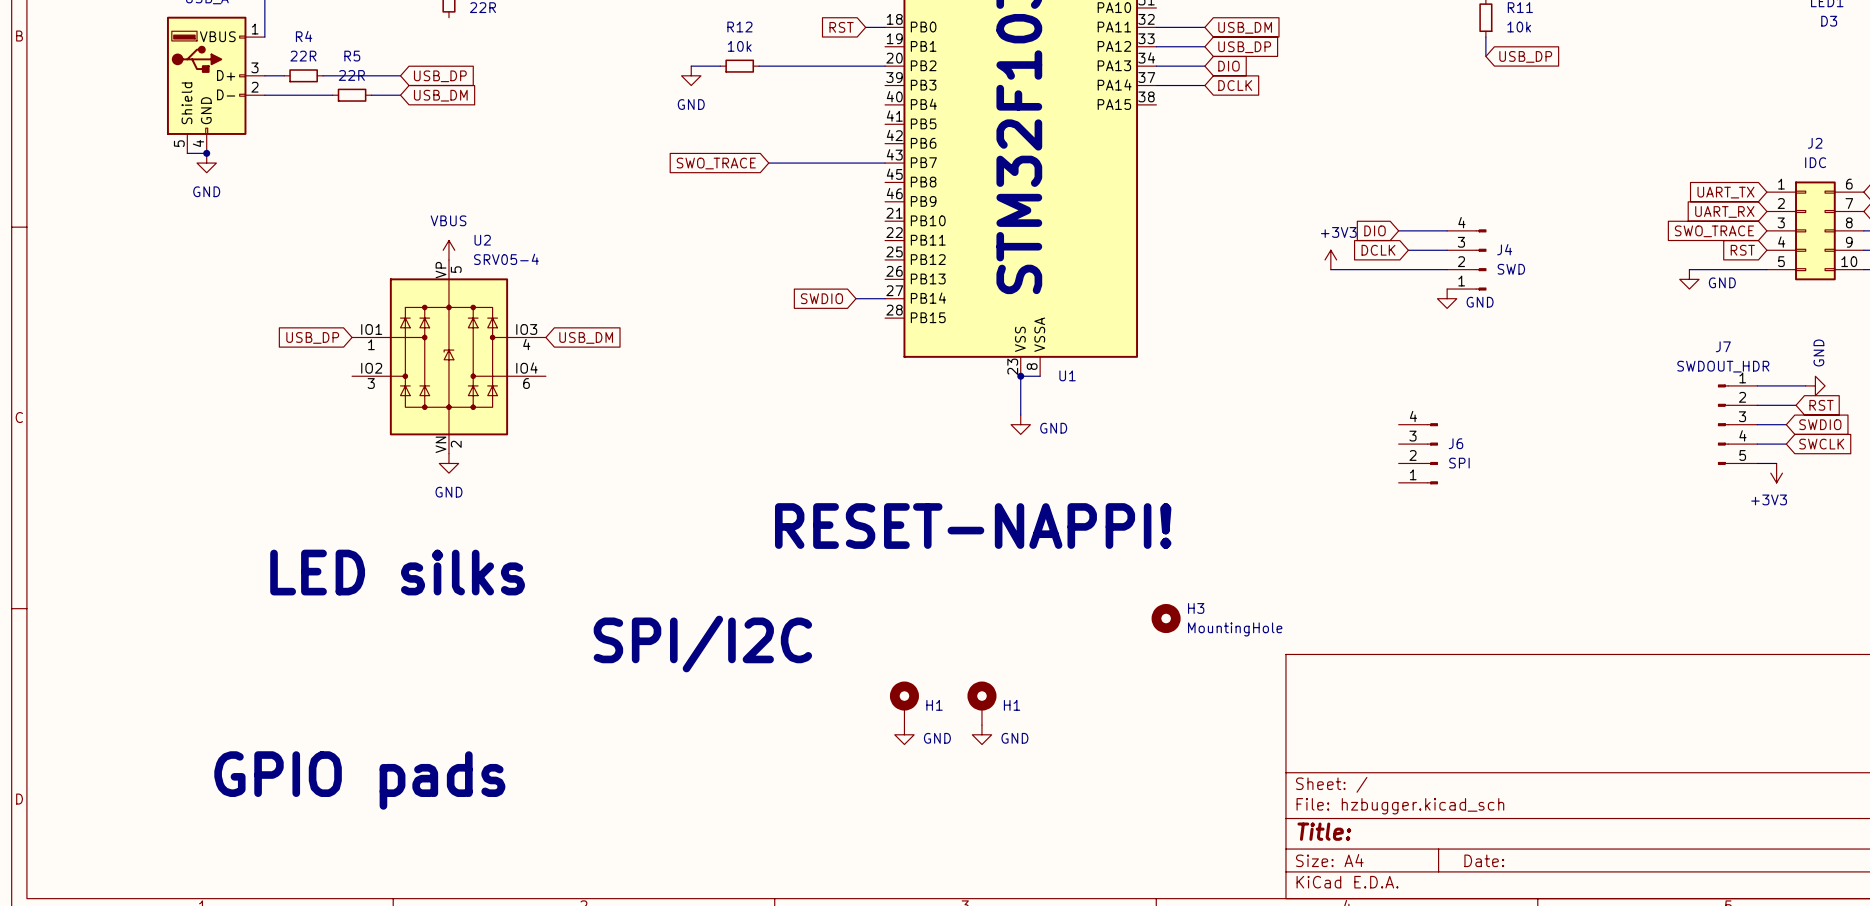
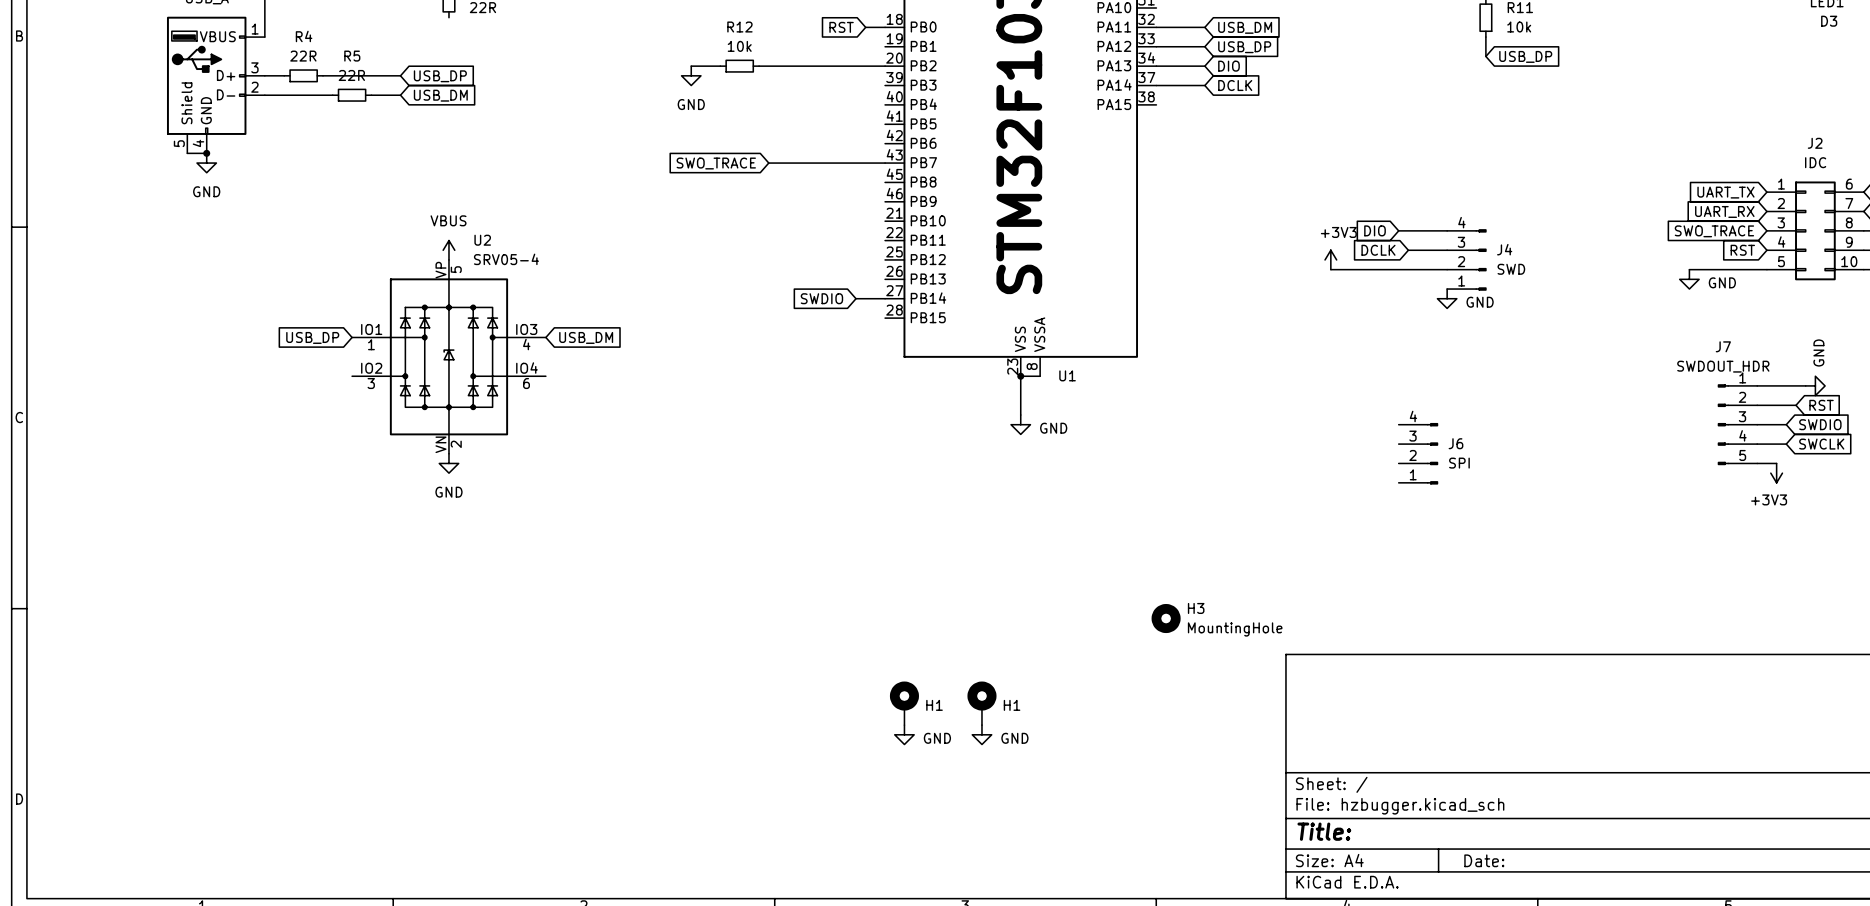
text: RESET-NAPPI! (973, 526) -> none
text: LED silks (397, 572) -> none
text: SPI/I2C (702, 644) -> none
text: GPIO pads (359, 780) -> none

